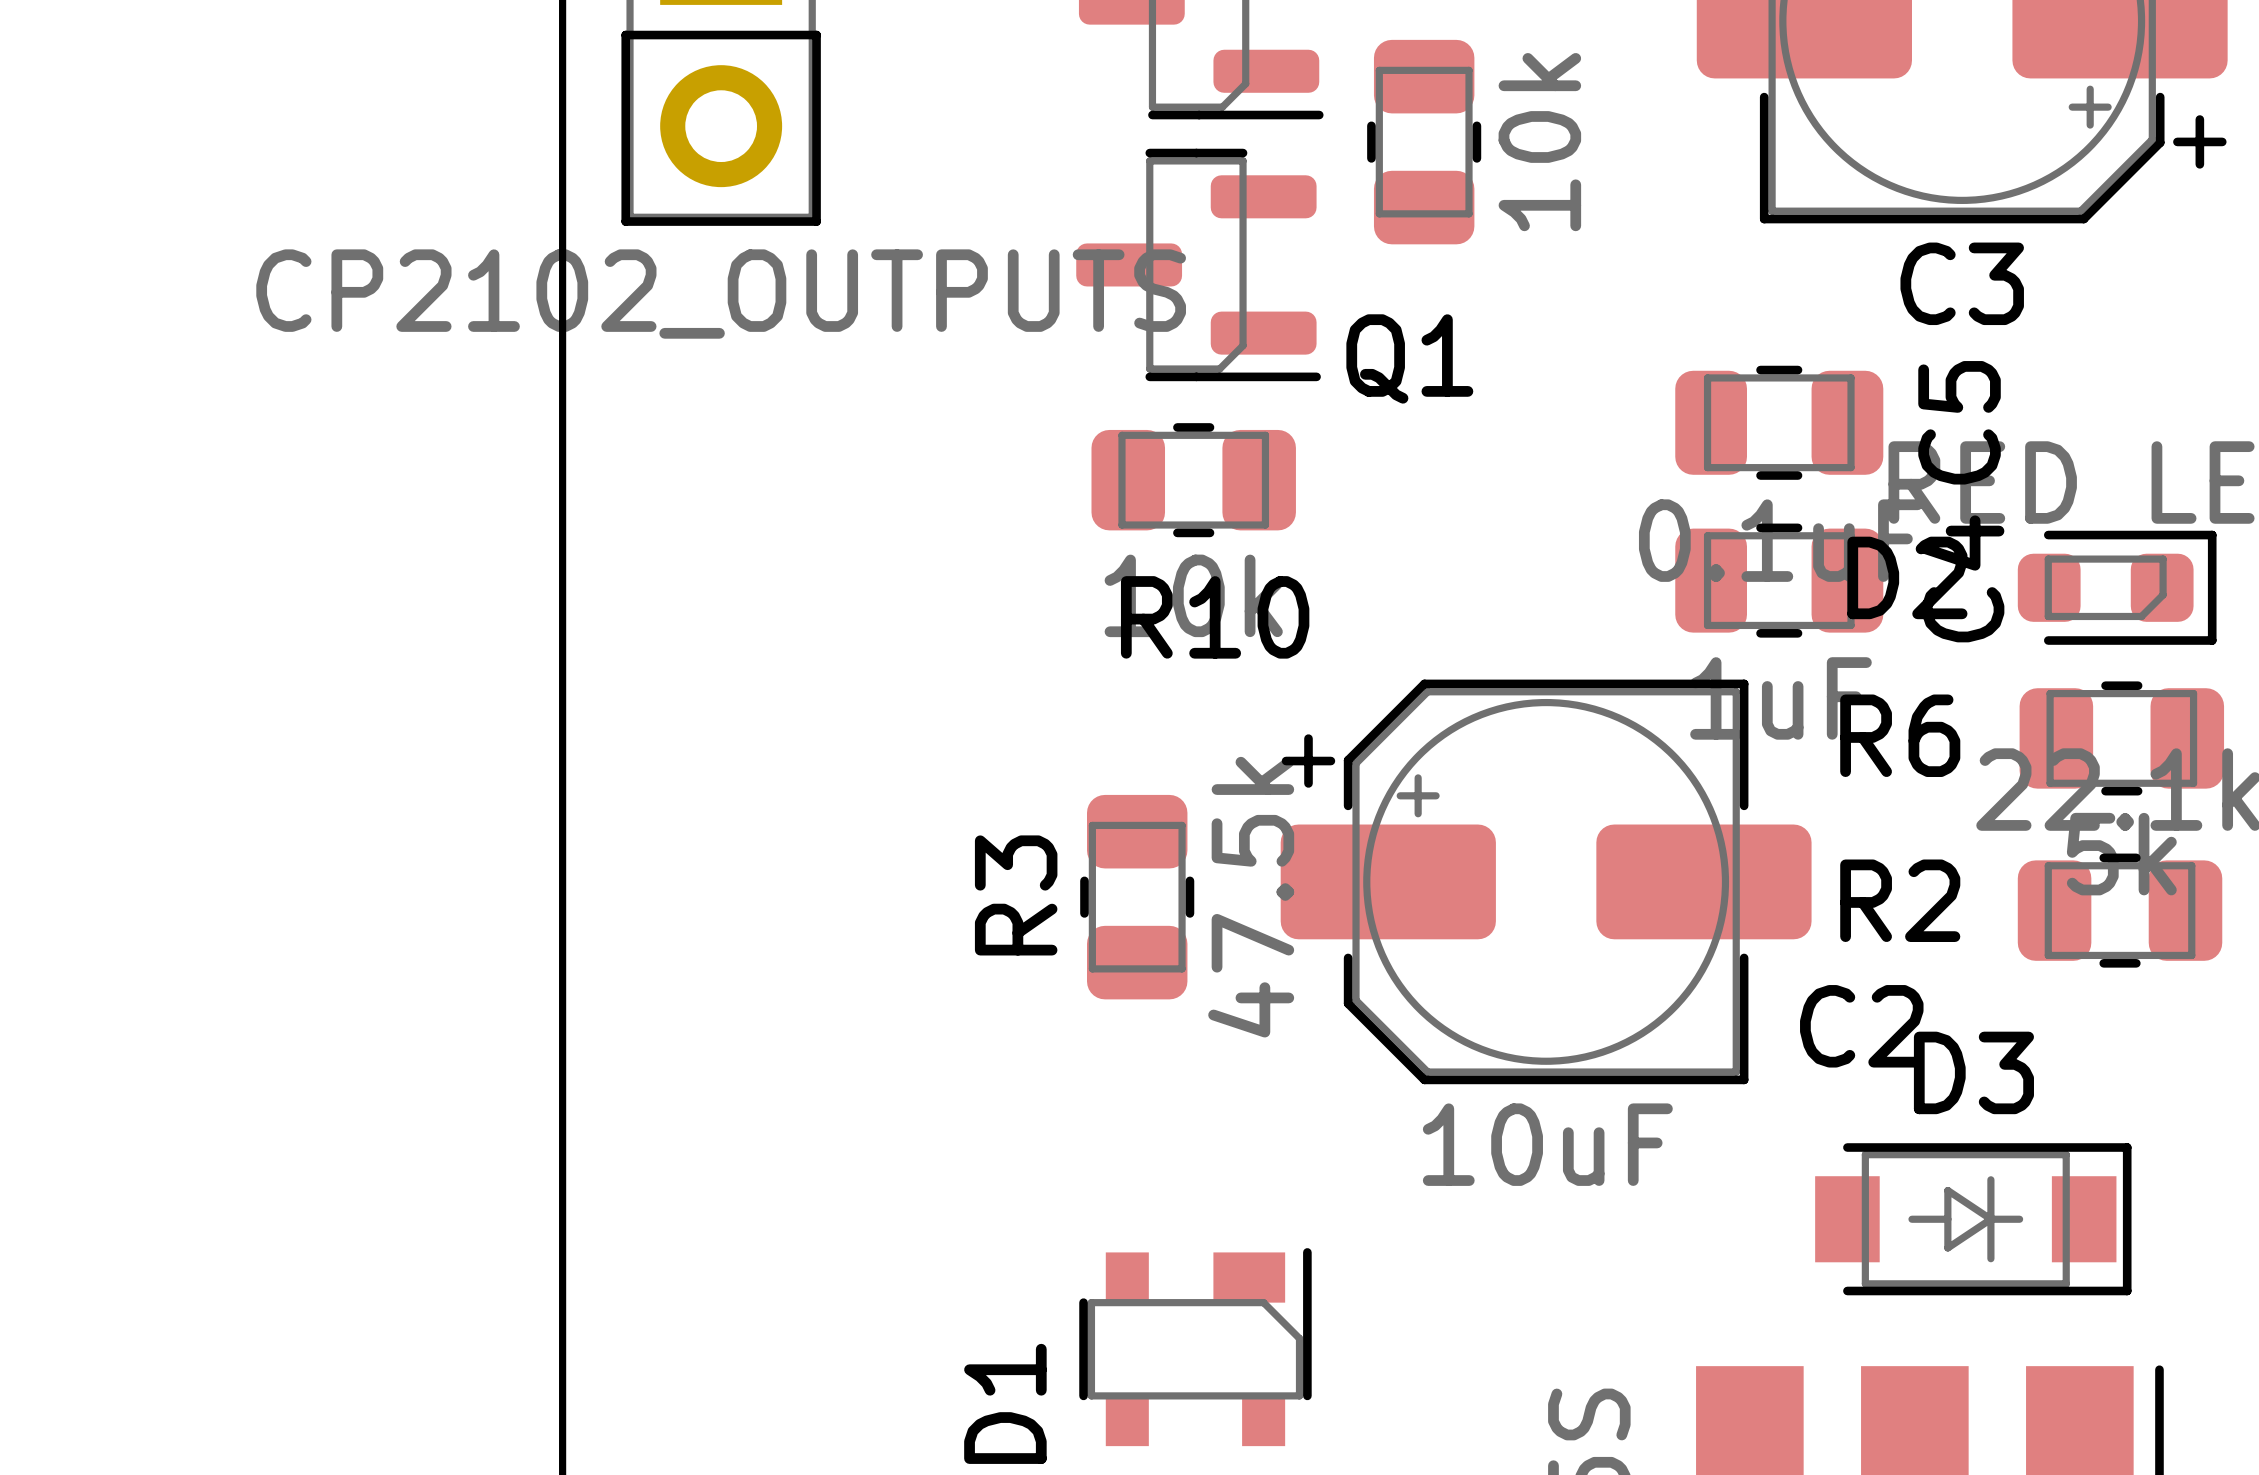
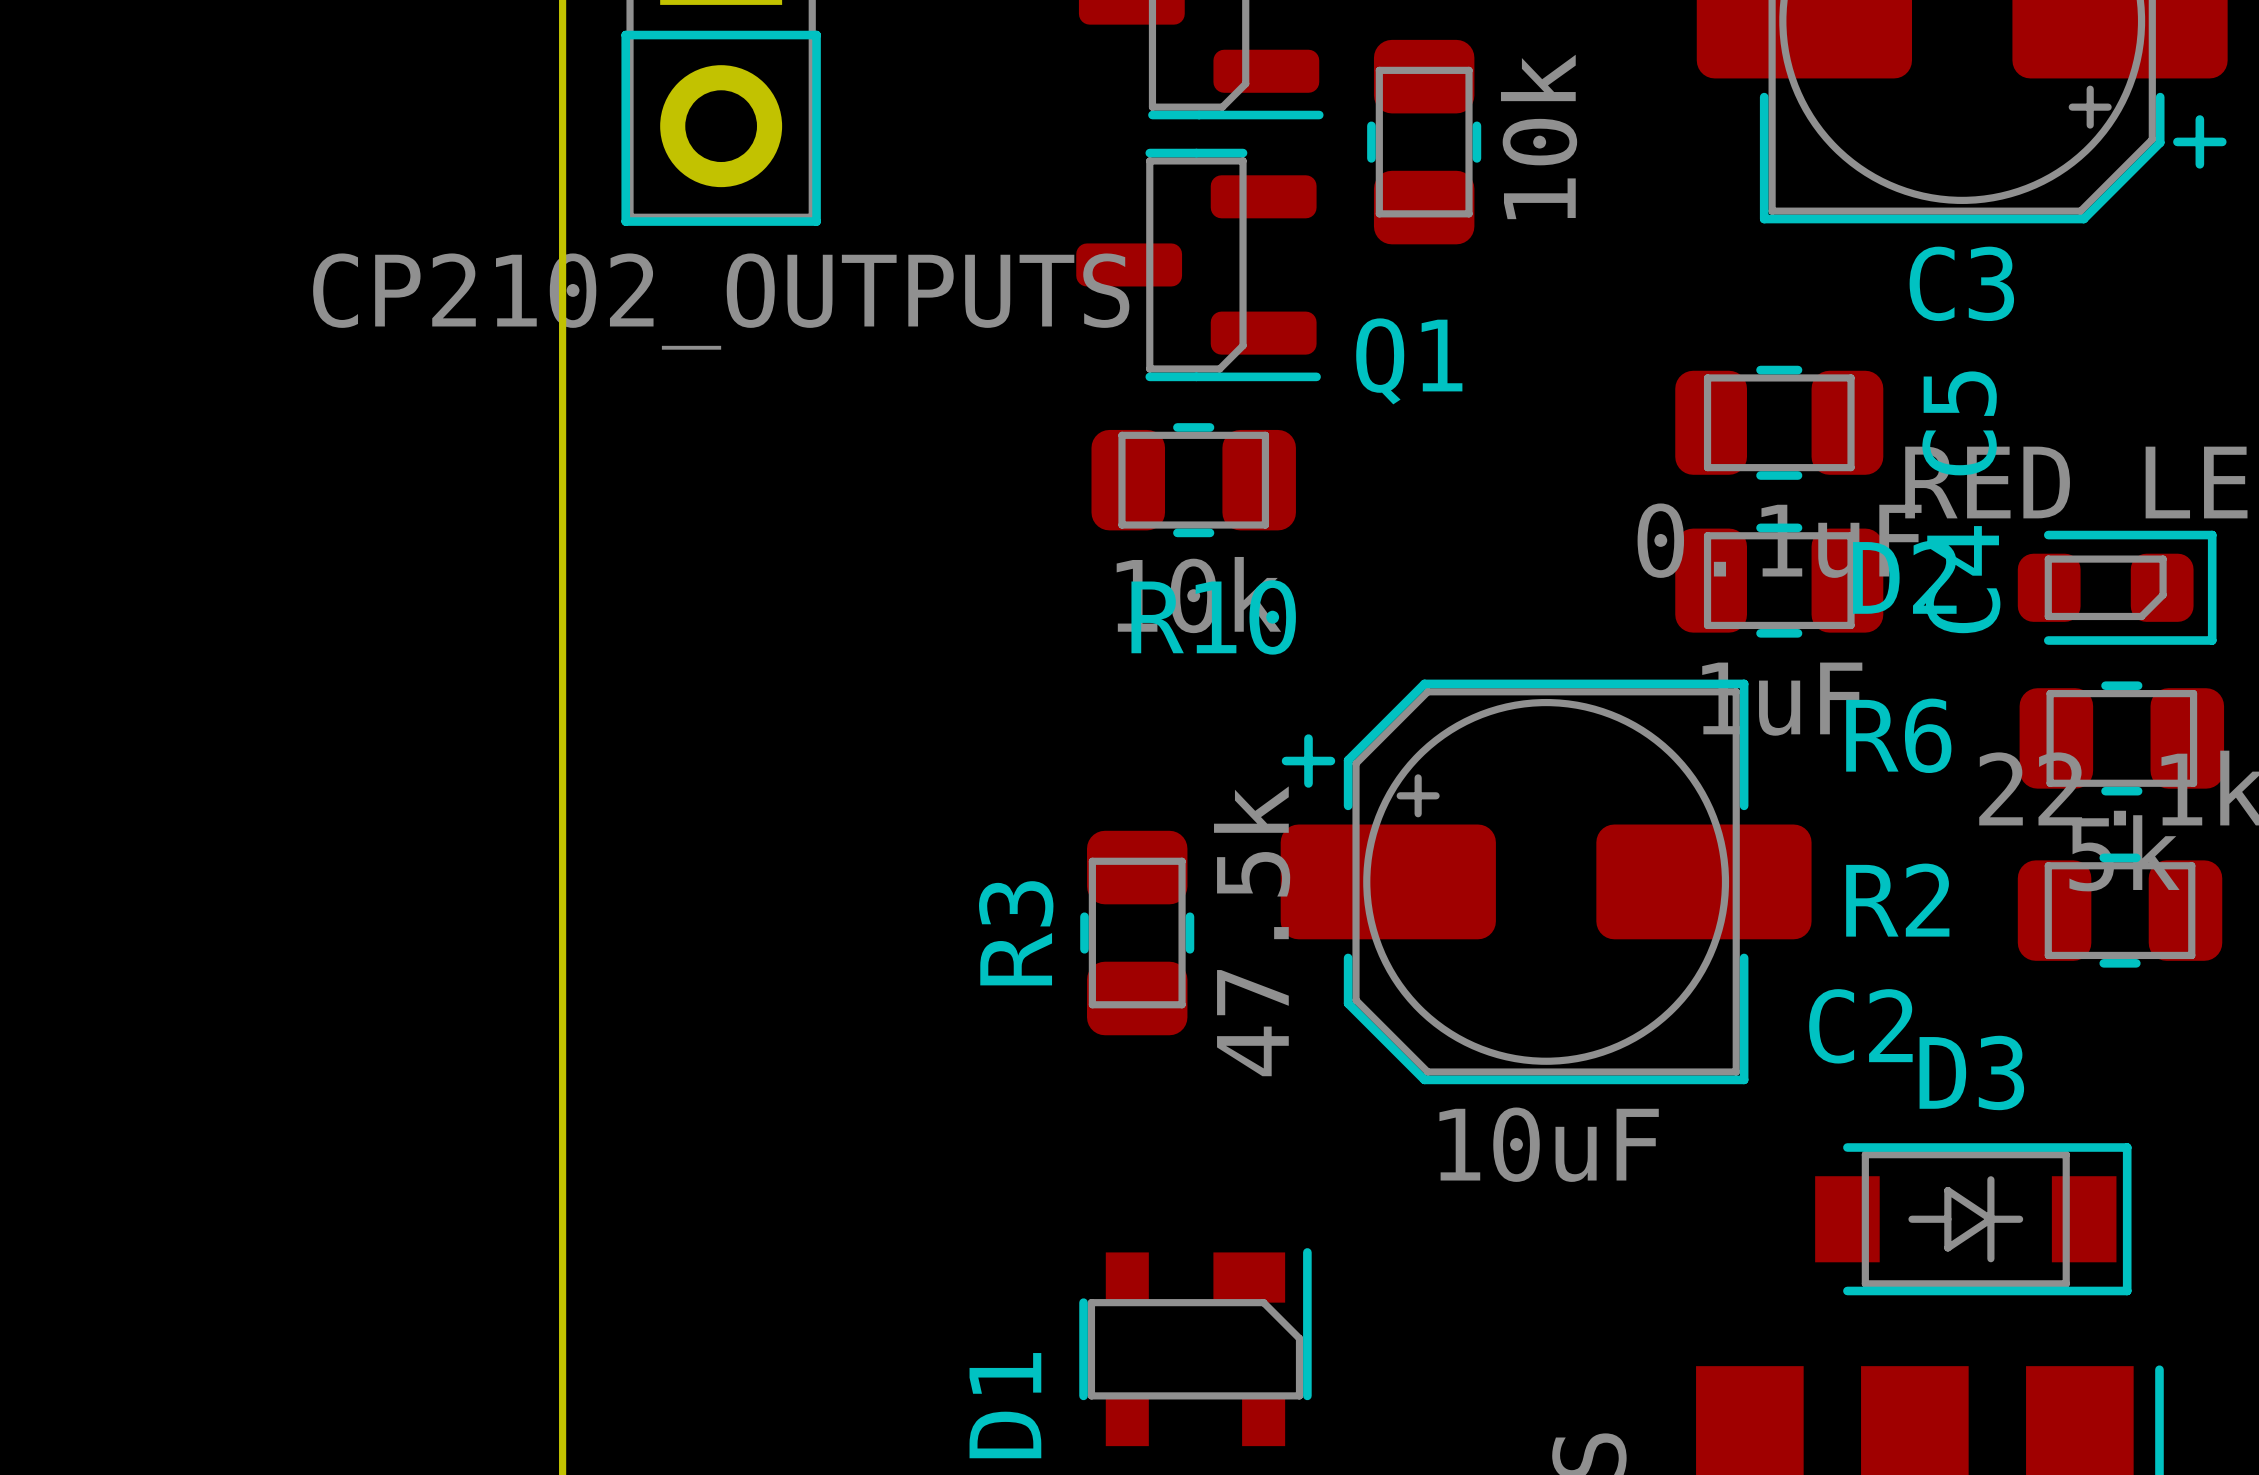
R3 position: (1137, 897) -> (1137, 933)

